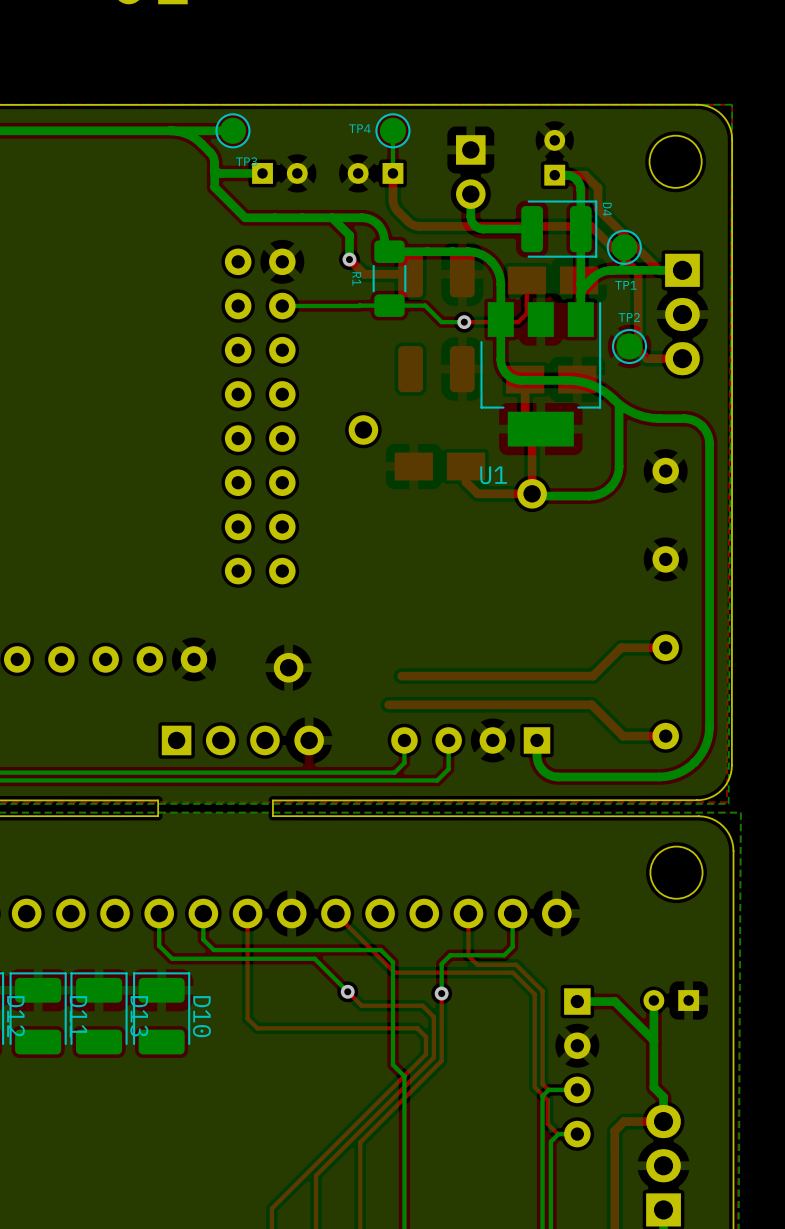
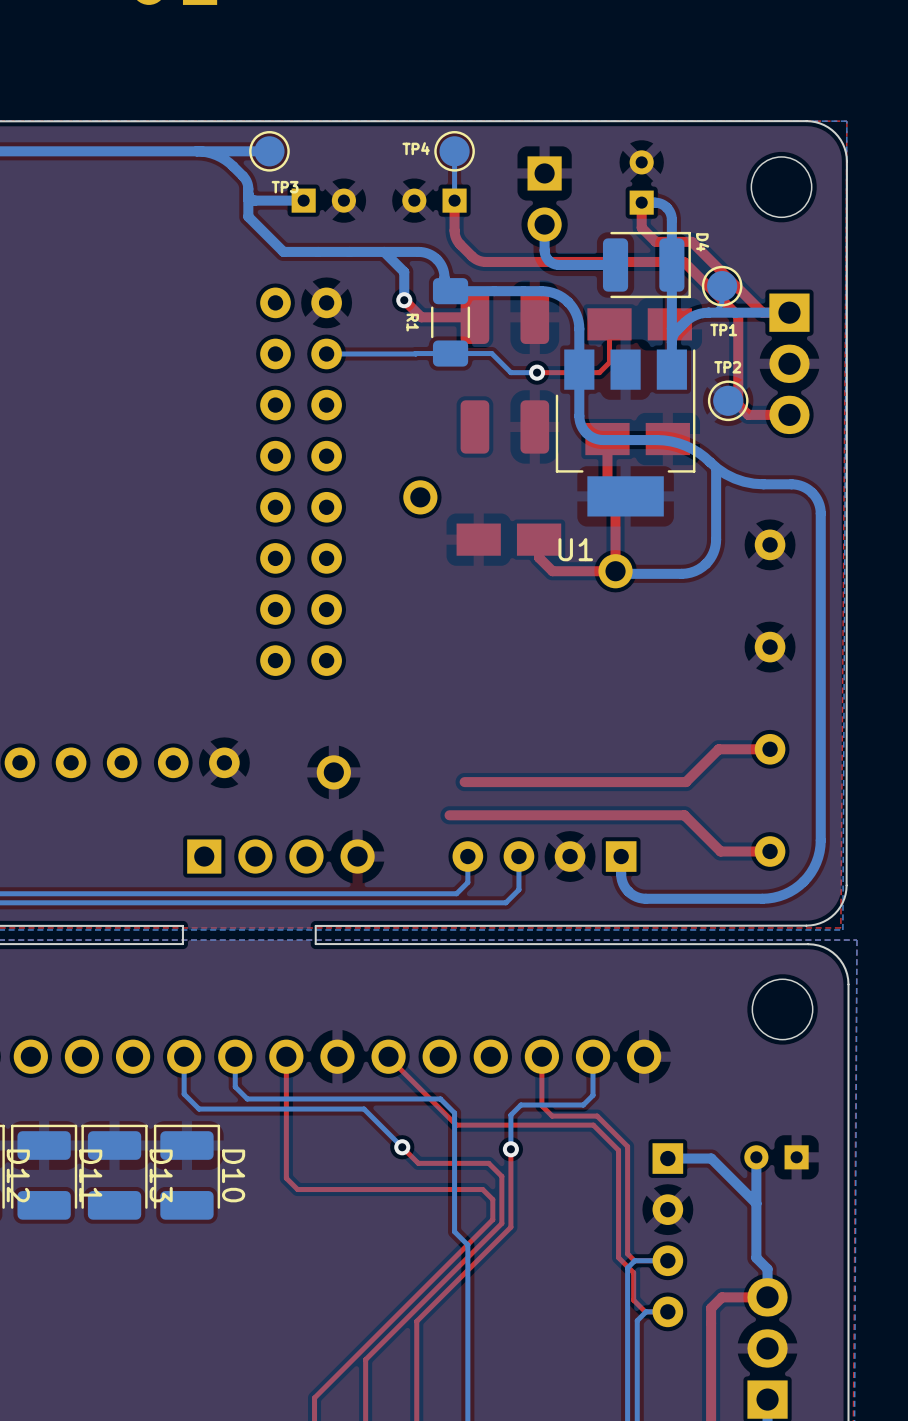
top track: (554, 175) (585, 175) (598, 188) (598, 209) -> (641, 202) (641, 227) (655, 241) (691, 241)

